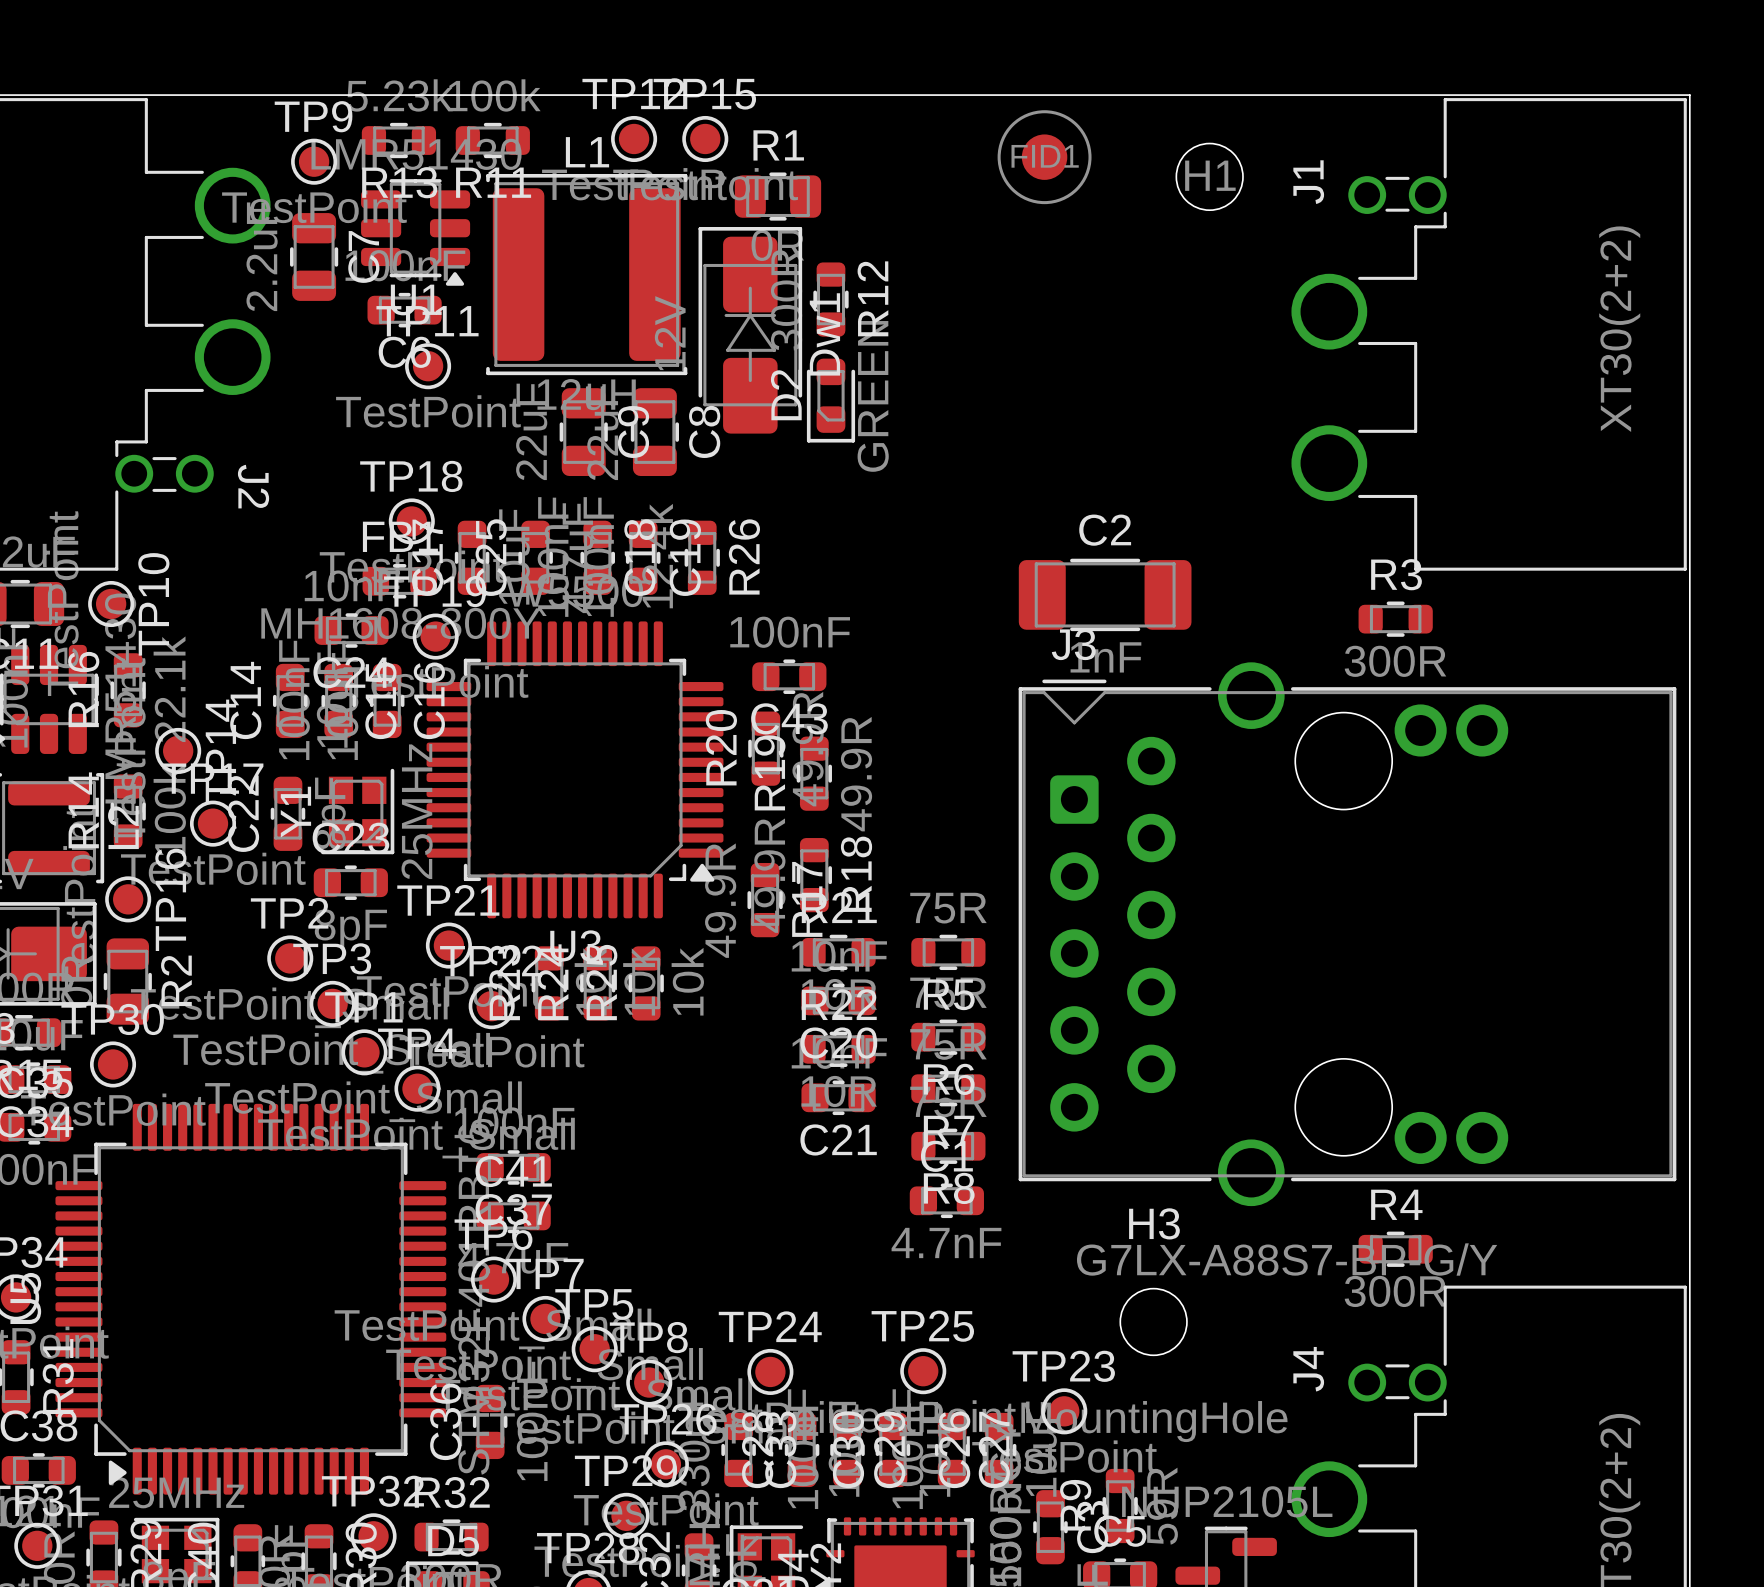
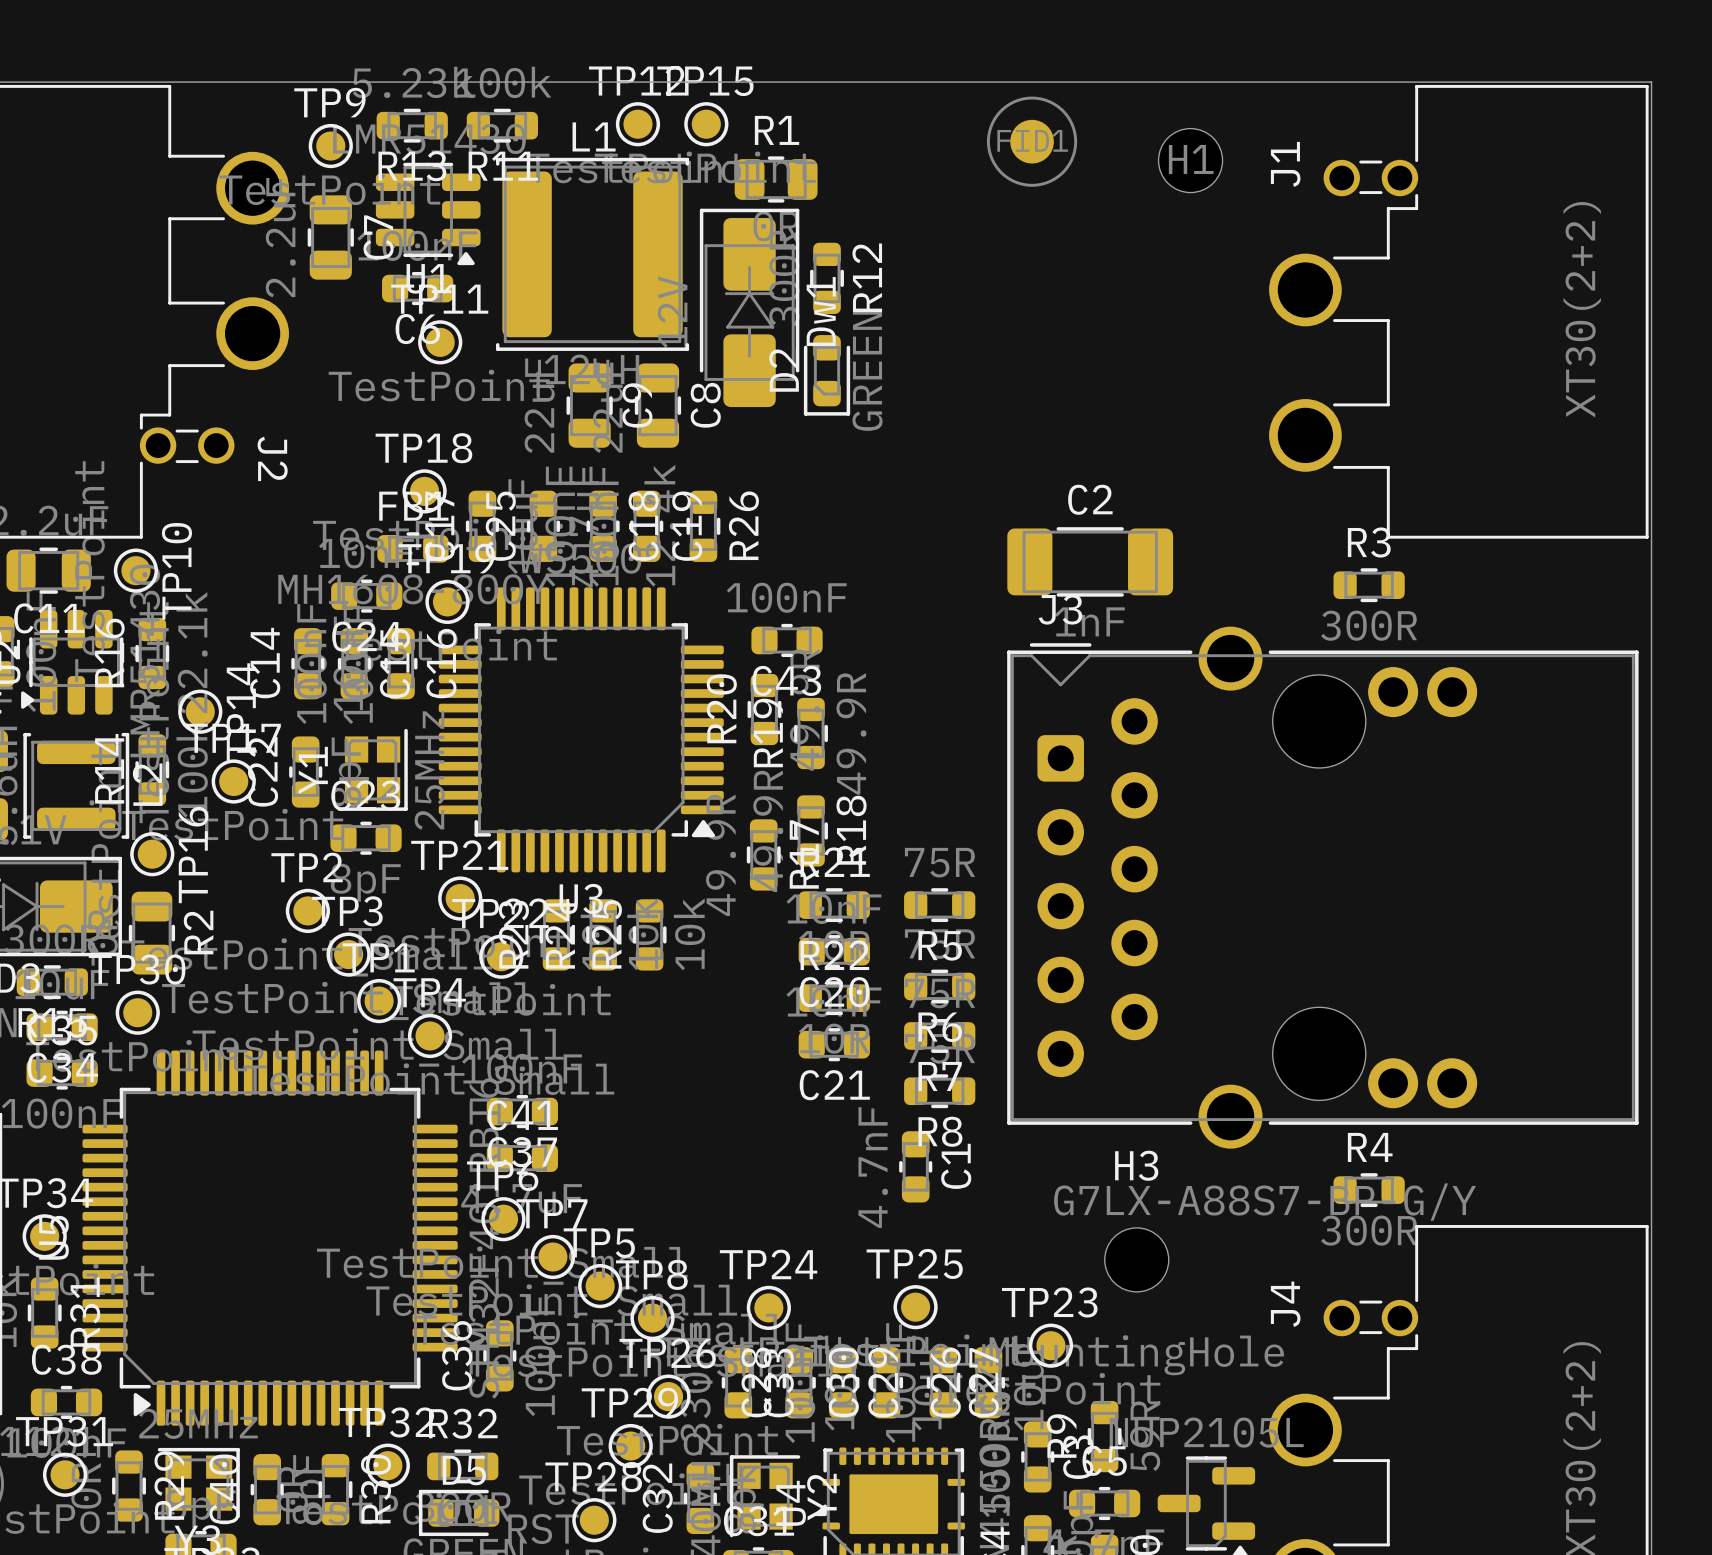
C1 rotation: 0° (946, 1200) -> 90° clockwise (915, 1166)

